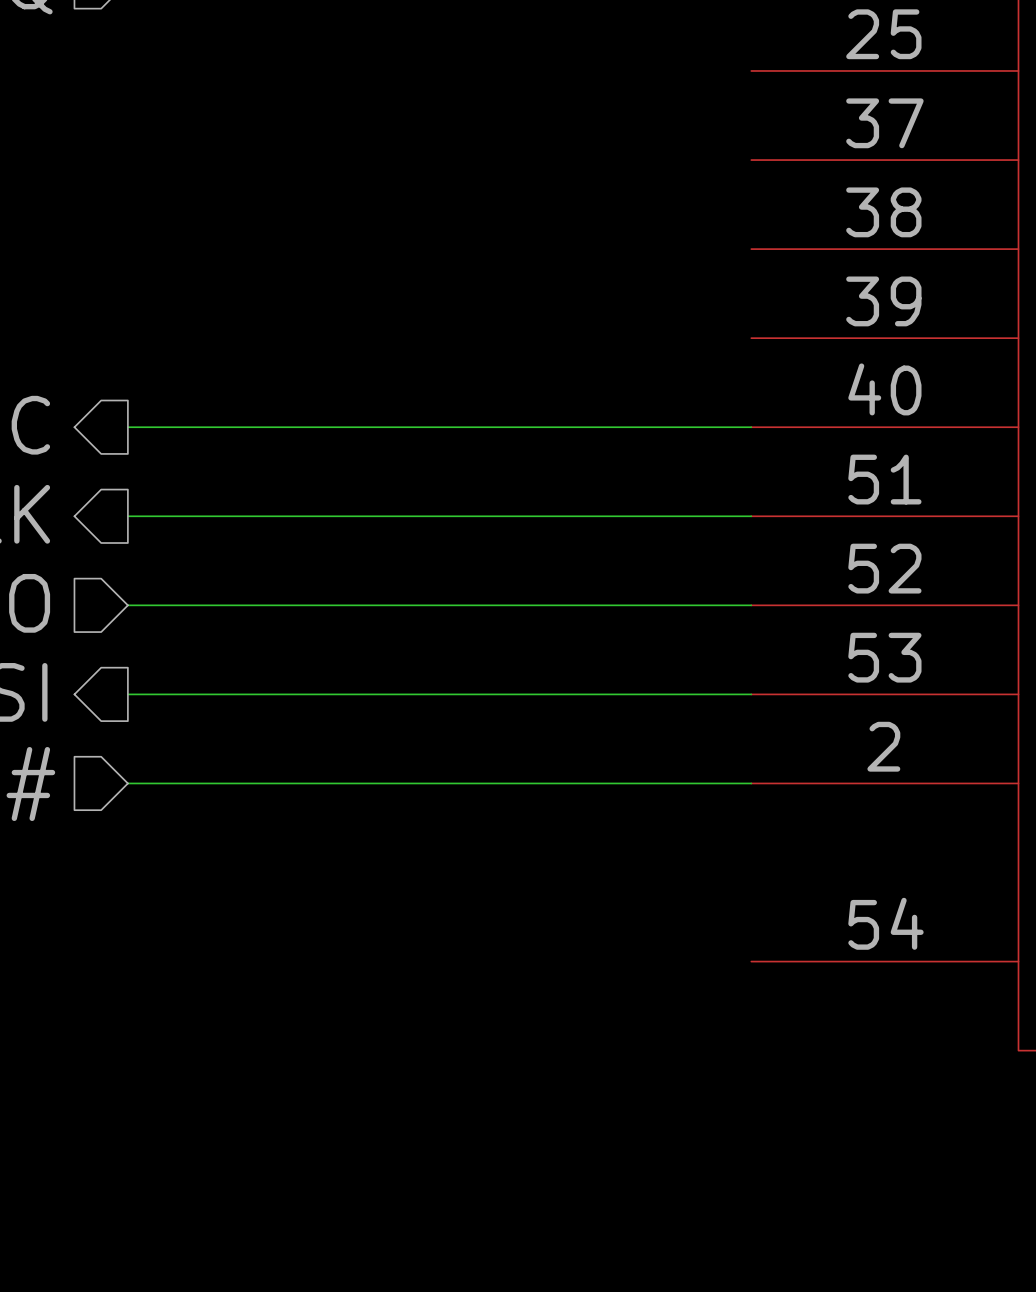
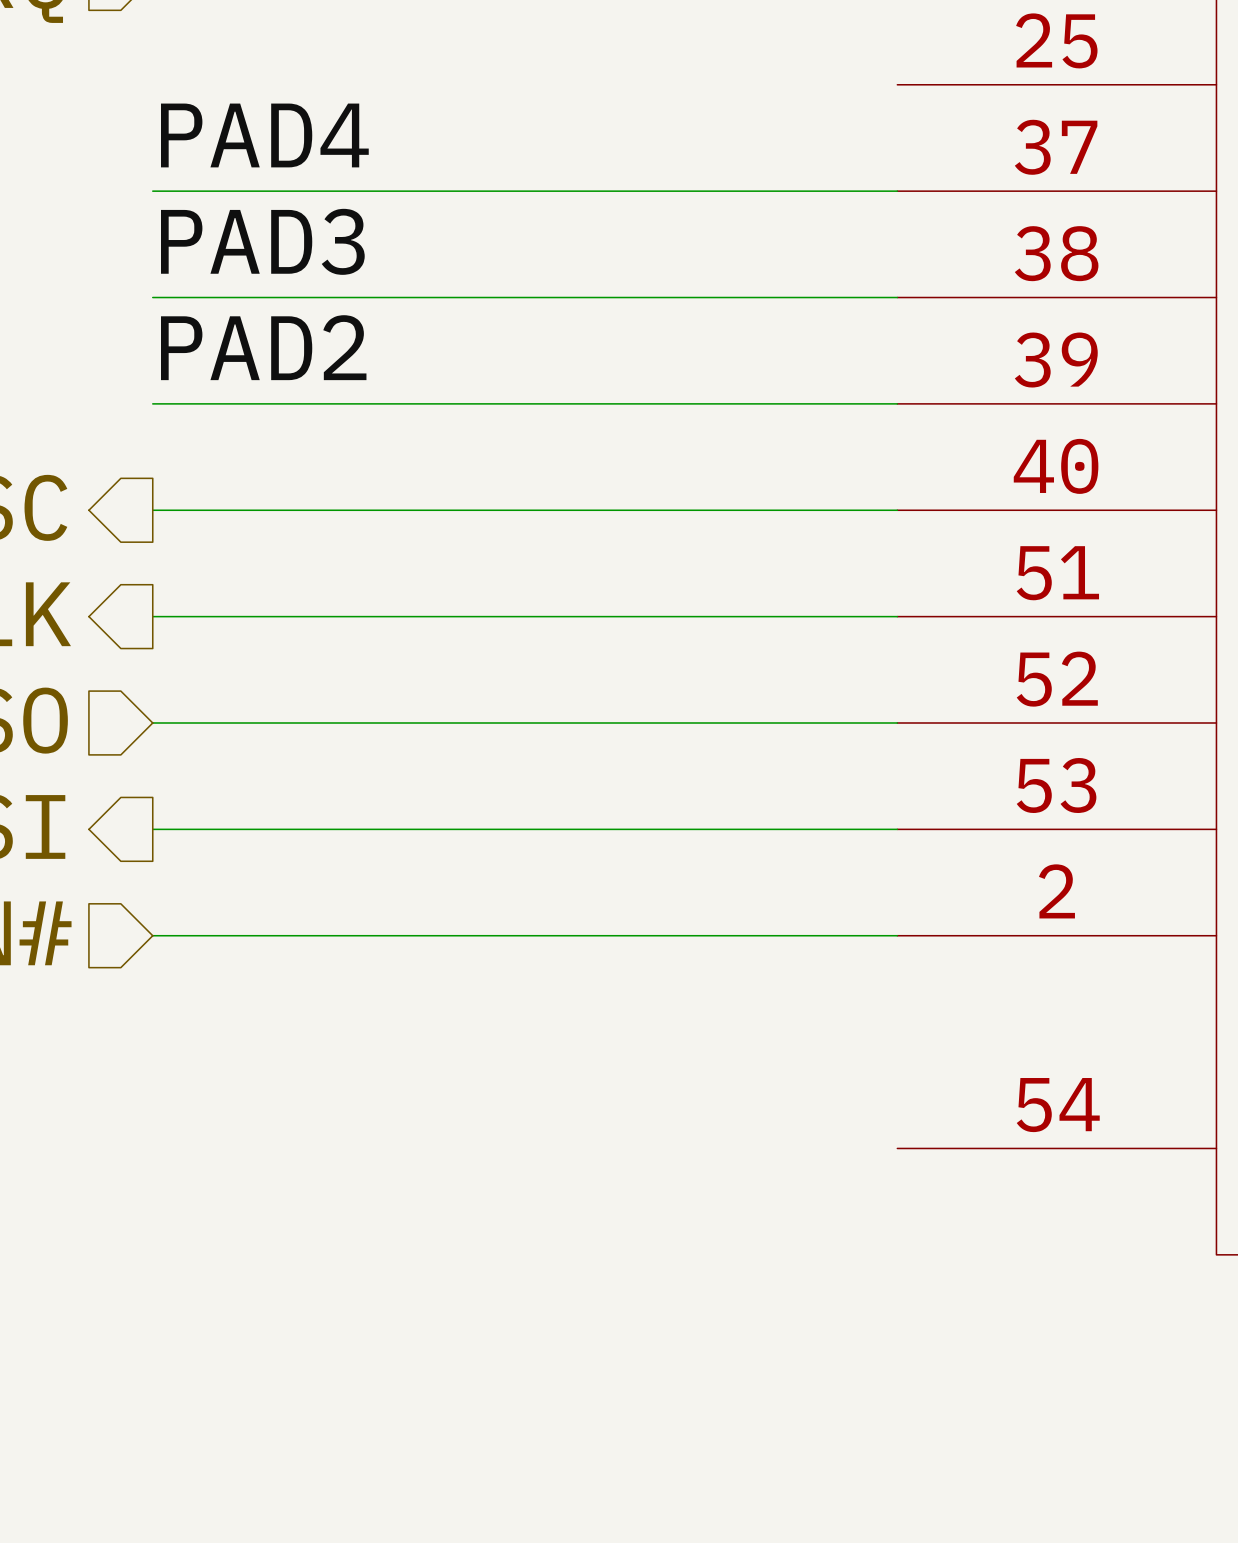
label: none -> PAD4 (264, 135)
wire: none -> (152, 191) (897, 191)
label: none -> PAD3 (262, 241)
wire: none -> (152, 297) (897, 297)
label: none -> PAD2 (263, 347)
wire: none -> (152, 403) (897, 403)

